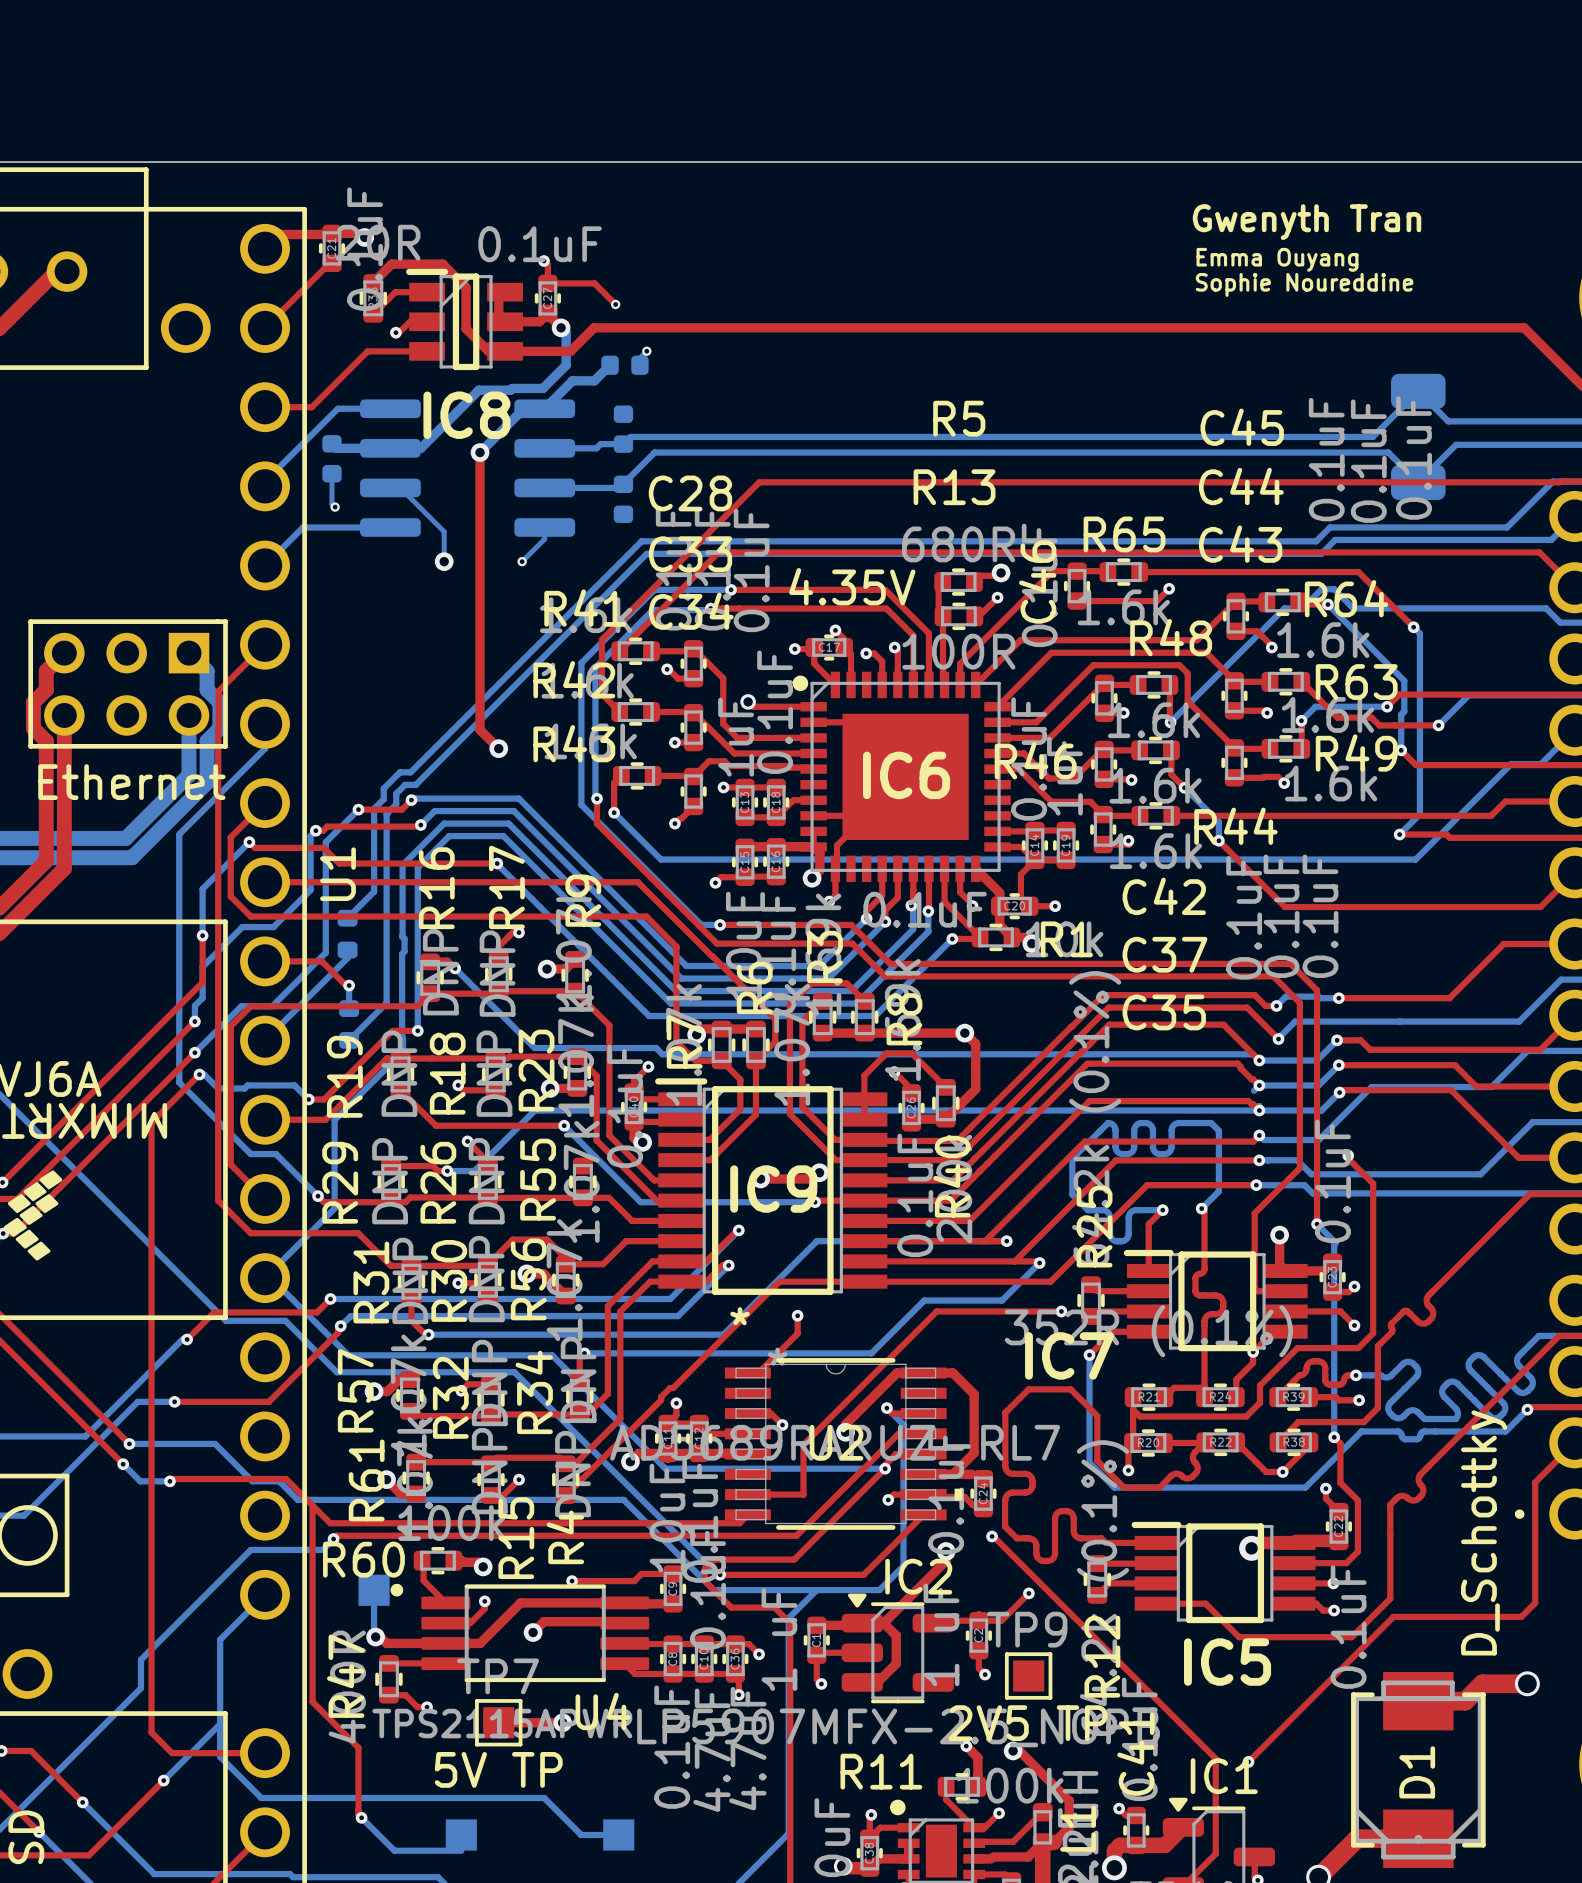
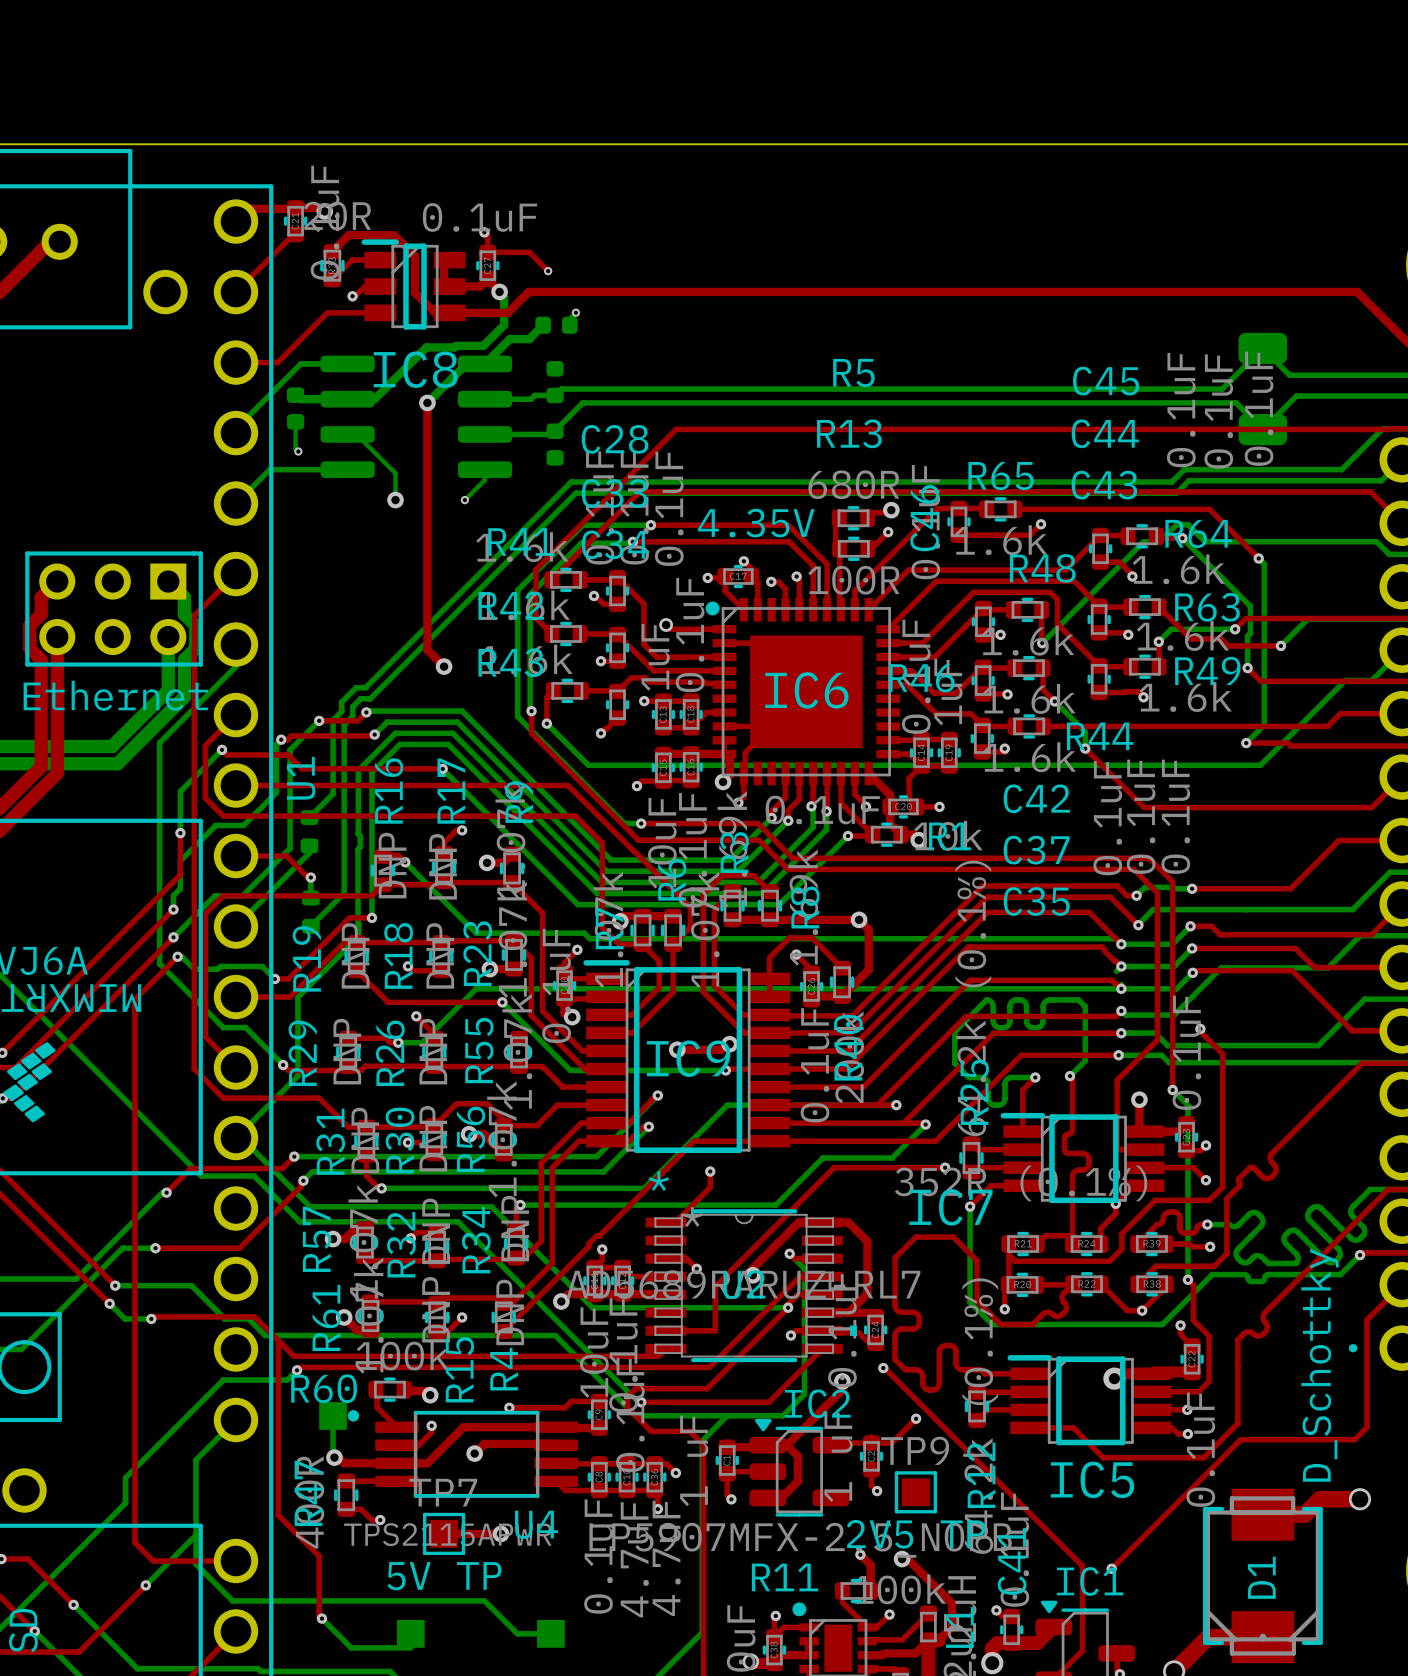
text: Gwenyth Tran (1307, 222) -> none
text: Emma Ouyang (1277, 259) -> none
text: Sophie Noureddine (1304, 284) -> none

